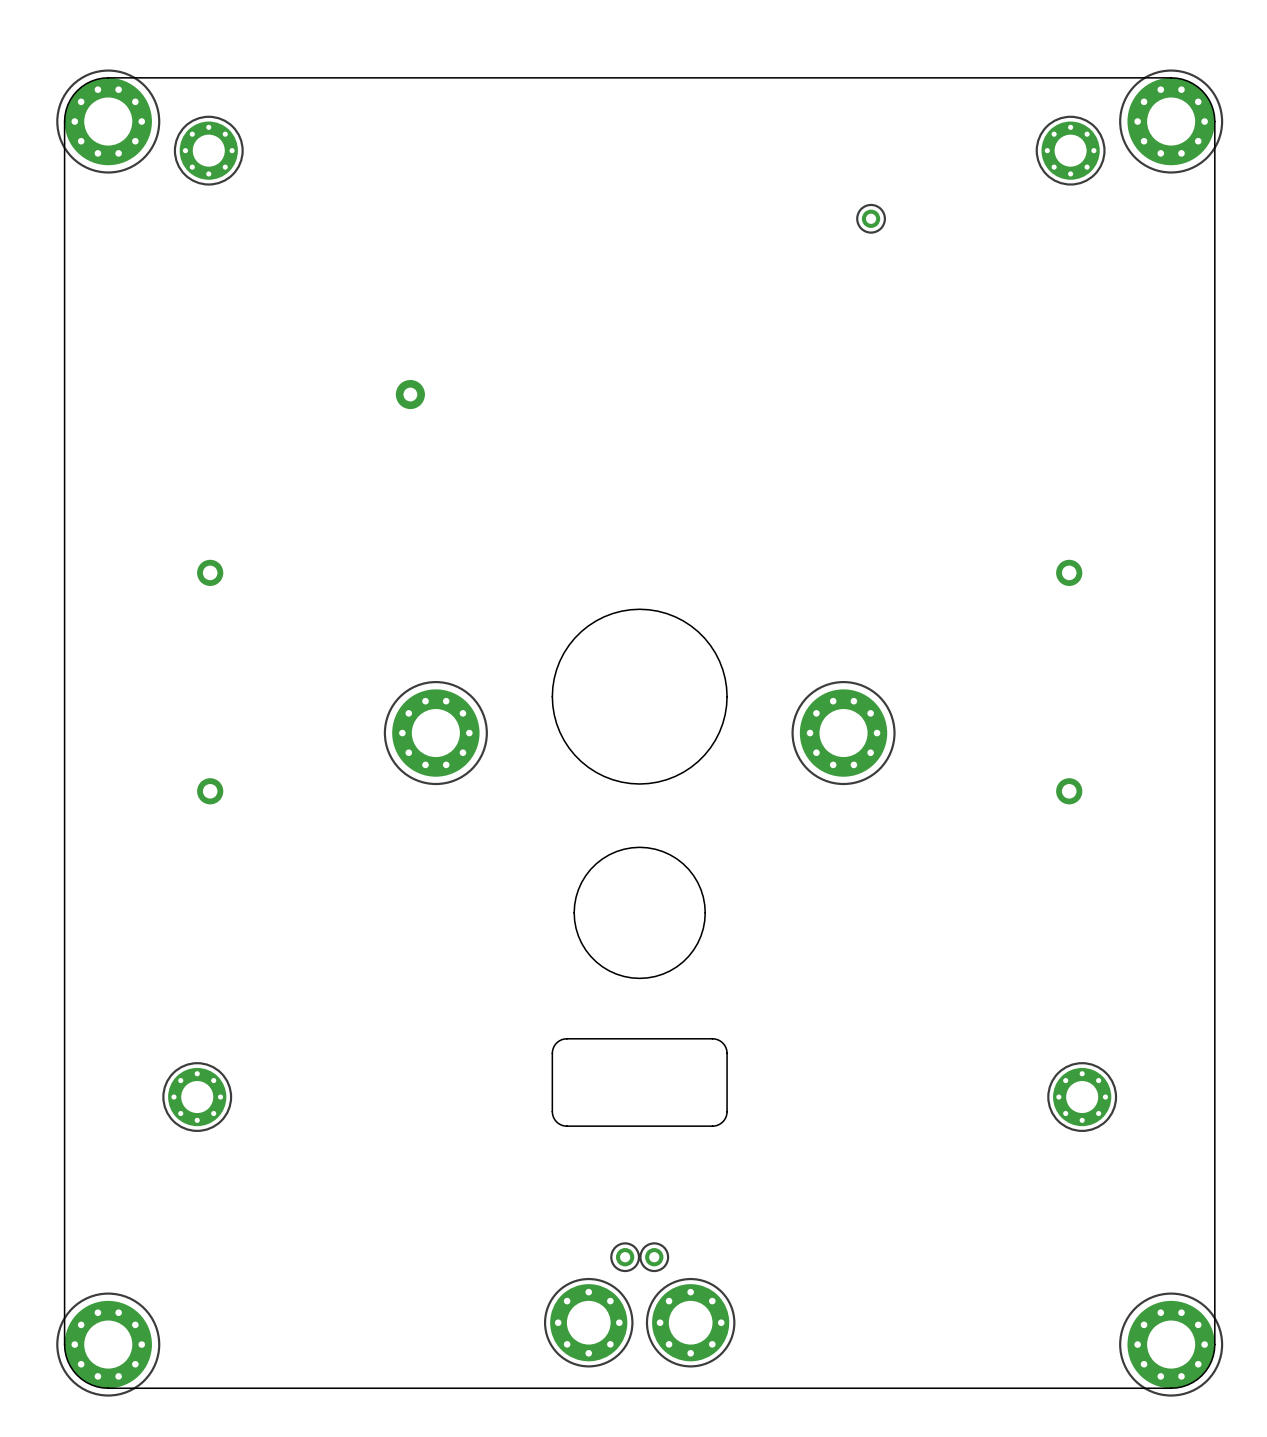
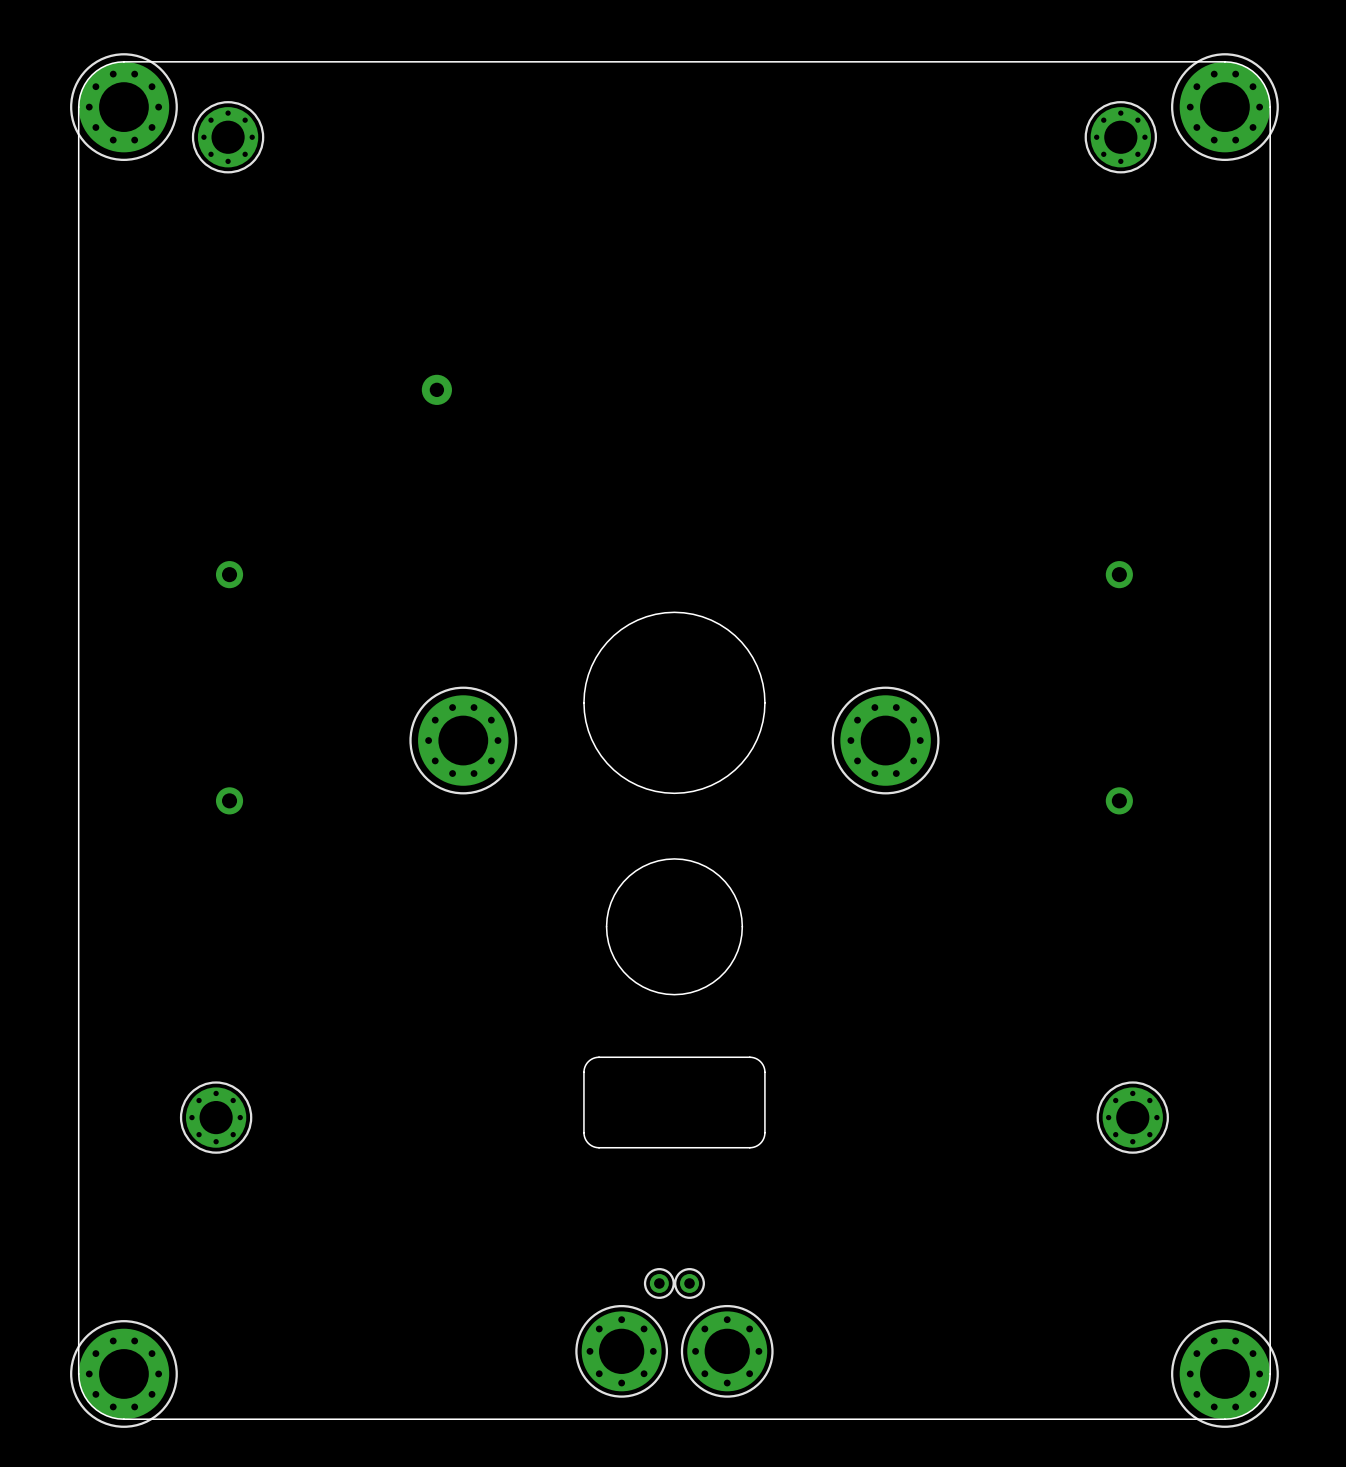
part: (871, 218) -> none

